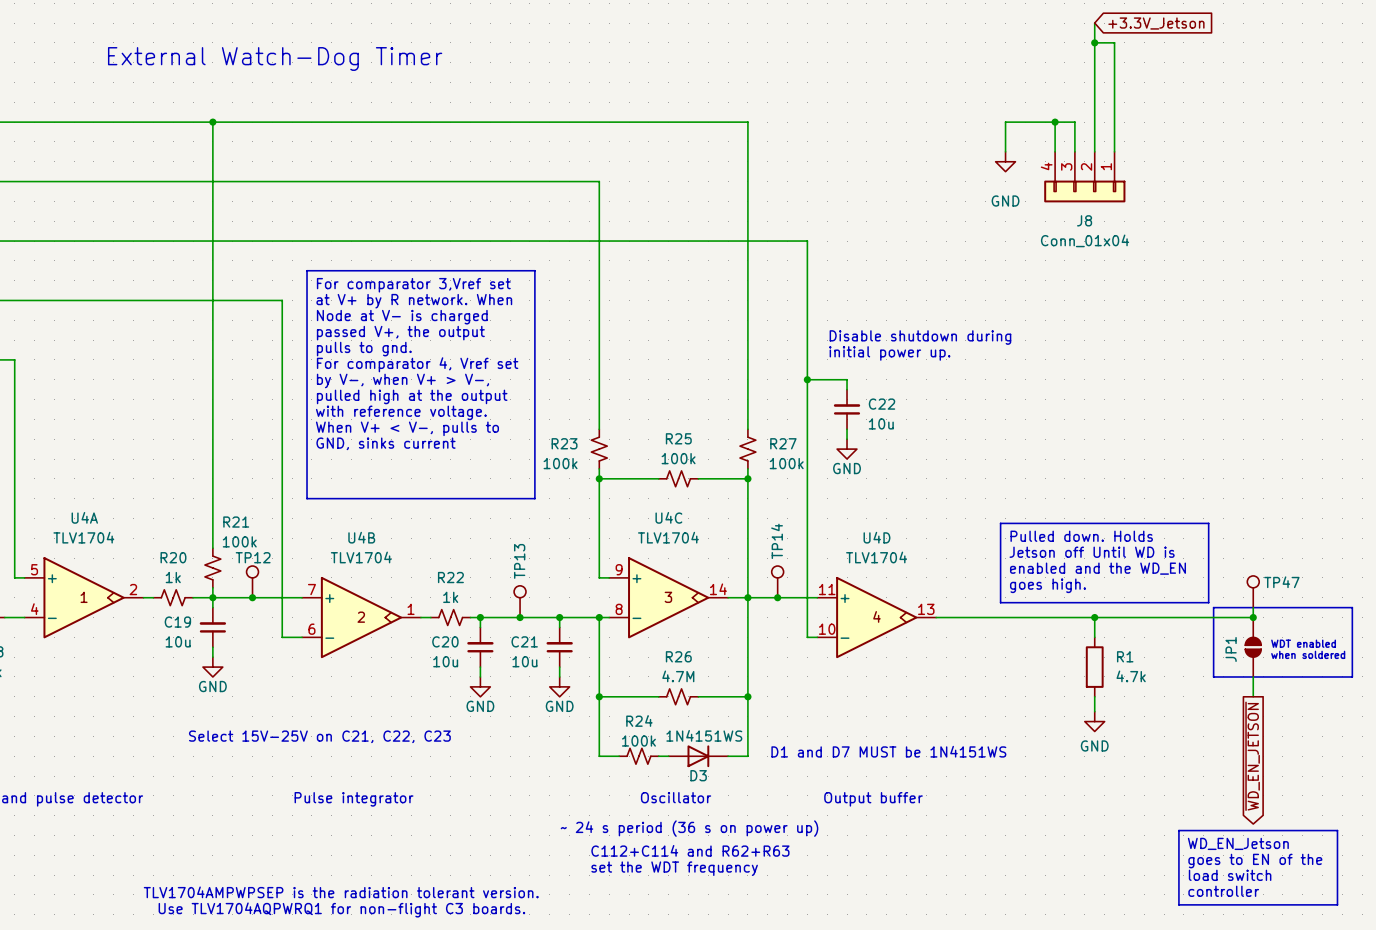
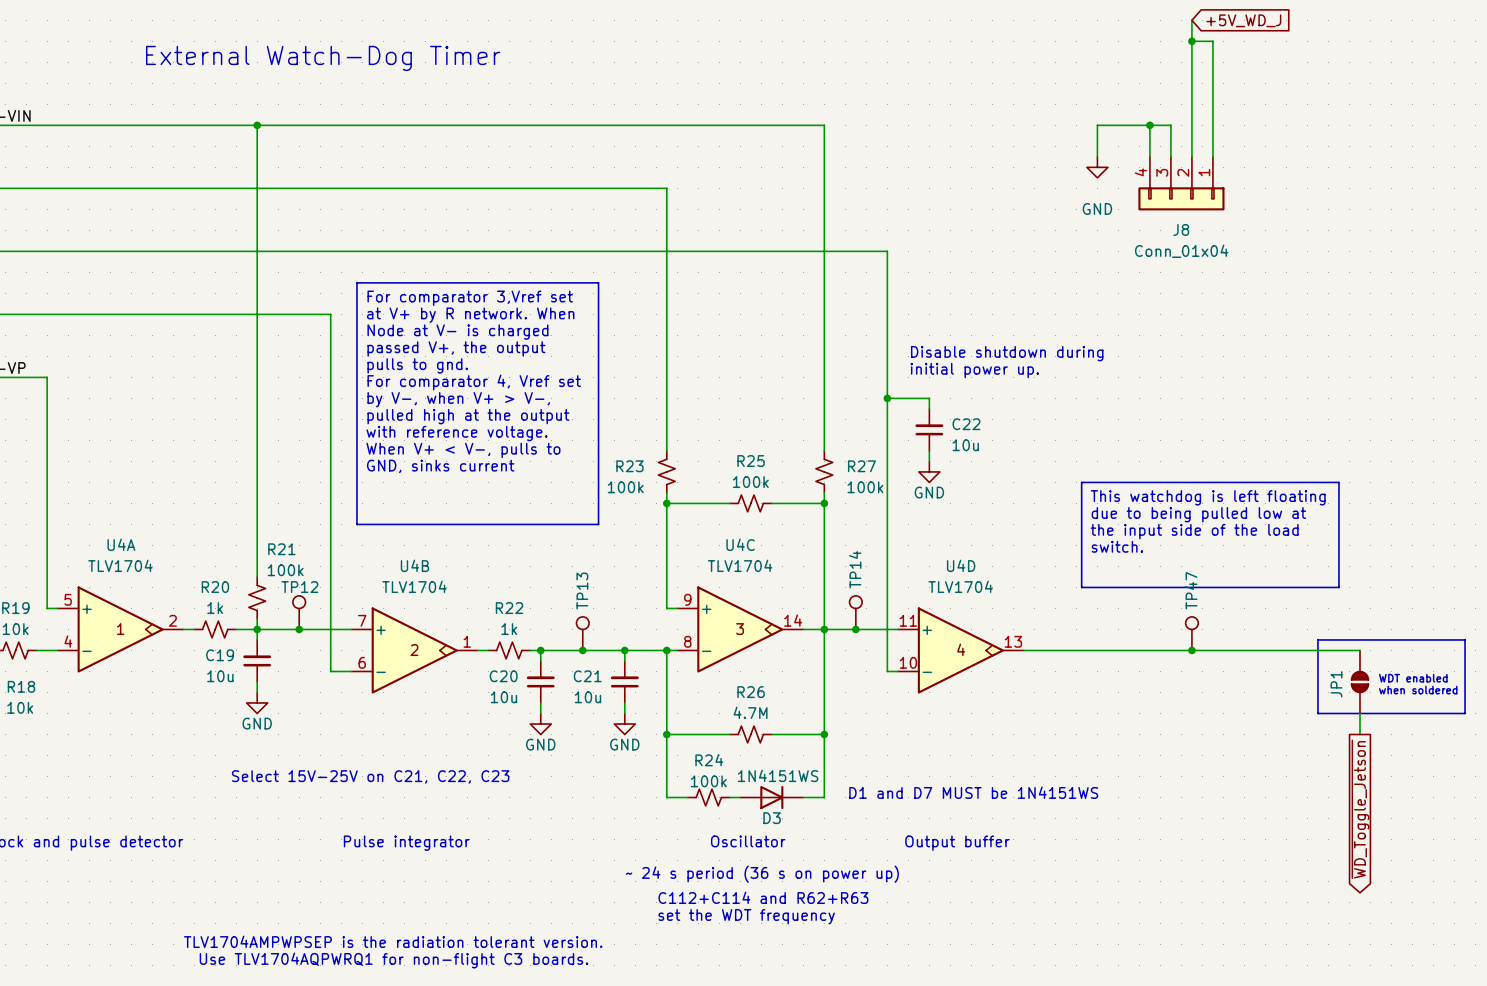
global label: +3.3V_Jetson (1156, 23) -> +5V_WD_J (1243, 20)
line: none -> (1081, 482) (1338, 482) (1338, 587) (1081, 587) (1081, 482)
text: none -> This watchdog is left floating (1208, 497)
text: none -> due to being pulled low at (1198, 514)
text: none -> the input side of the load (1194, 531)
text: none -> switch. (1117, 546)
line: (1000, 523) (1208, 523) (1208, 602) (1000, 602) (1000, 523) -> none
text: Pulled down. Holds (1081, 536) -> none
text: Jetson off Until WD is (1092, 552) -> none
text: enabled and the WD_EN (1097, 568) -> none
TP47 name rotation: 0° (1281, 582) -> 90° counterclockwise (1191, 590)
TP47 name position: TP47 (1281, 582) -> TP47 (1191, 590)
text: goes high. (1047, 585) -> none
TP47 position: (1253, 591) -> (1191, 633)
wire: (1253, 607) (1253, 617) -> none
wire: (1094, 617) (1094, 637) -> none
junction: (1253, 617) -> none
R1: 4.7k (1094, 667) -> none
wire: (1094, 696) (1094, 711) -> none
power symbol: GND (1094, 721) -> none
global label: ~{WD_EN_JETSON} (1252, 756) -> ~{WD_Toggle_Jetson} (1360, 809)
line: (1178, 830) (1337, 830) (1337, 904) (1178, 904) (1178, 830) -> none
text: WD_EN_Jetson (1238, 843) -> none
text: goes to EN of the (1255, 861) -> none
text: load switch (1230, 875) -> none
text: controller (1223, 891) -> none

